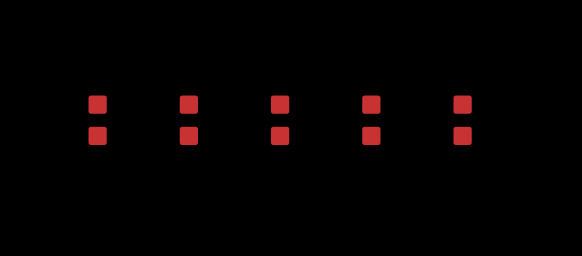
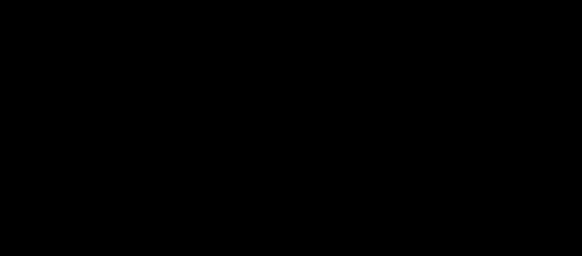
part: (97, 120) -> none
part: (188, 120) -> none
part: (280, 120) -> none
part: (371, 120) -> none
part: (462, 120) -> none

